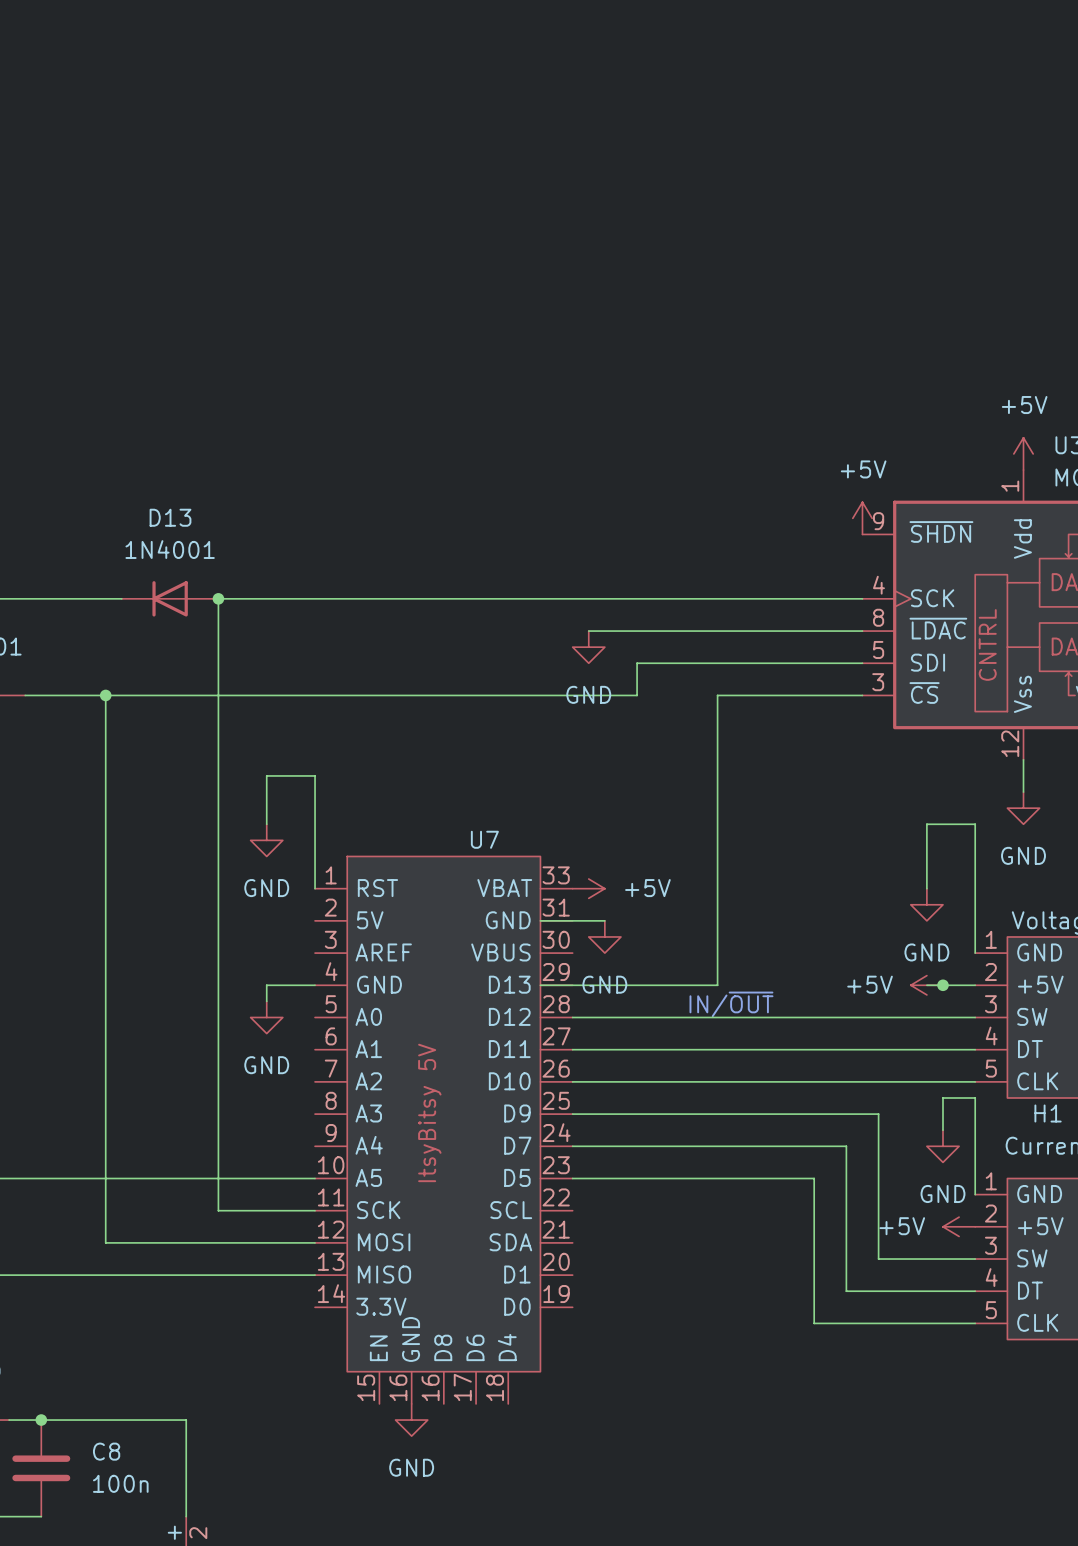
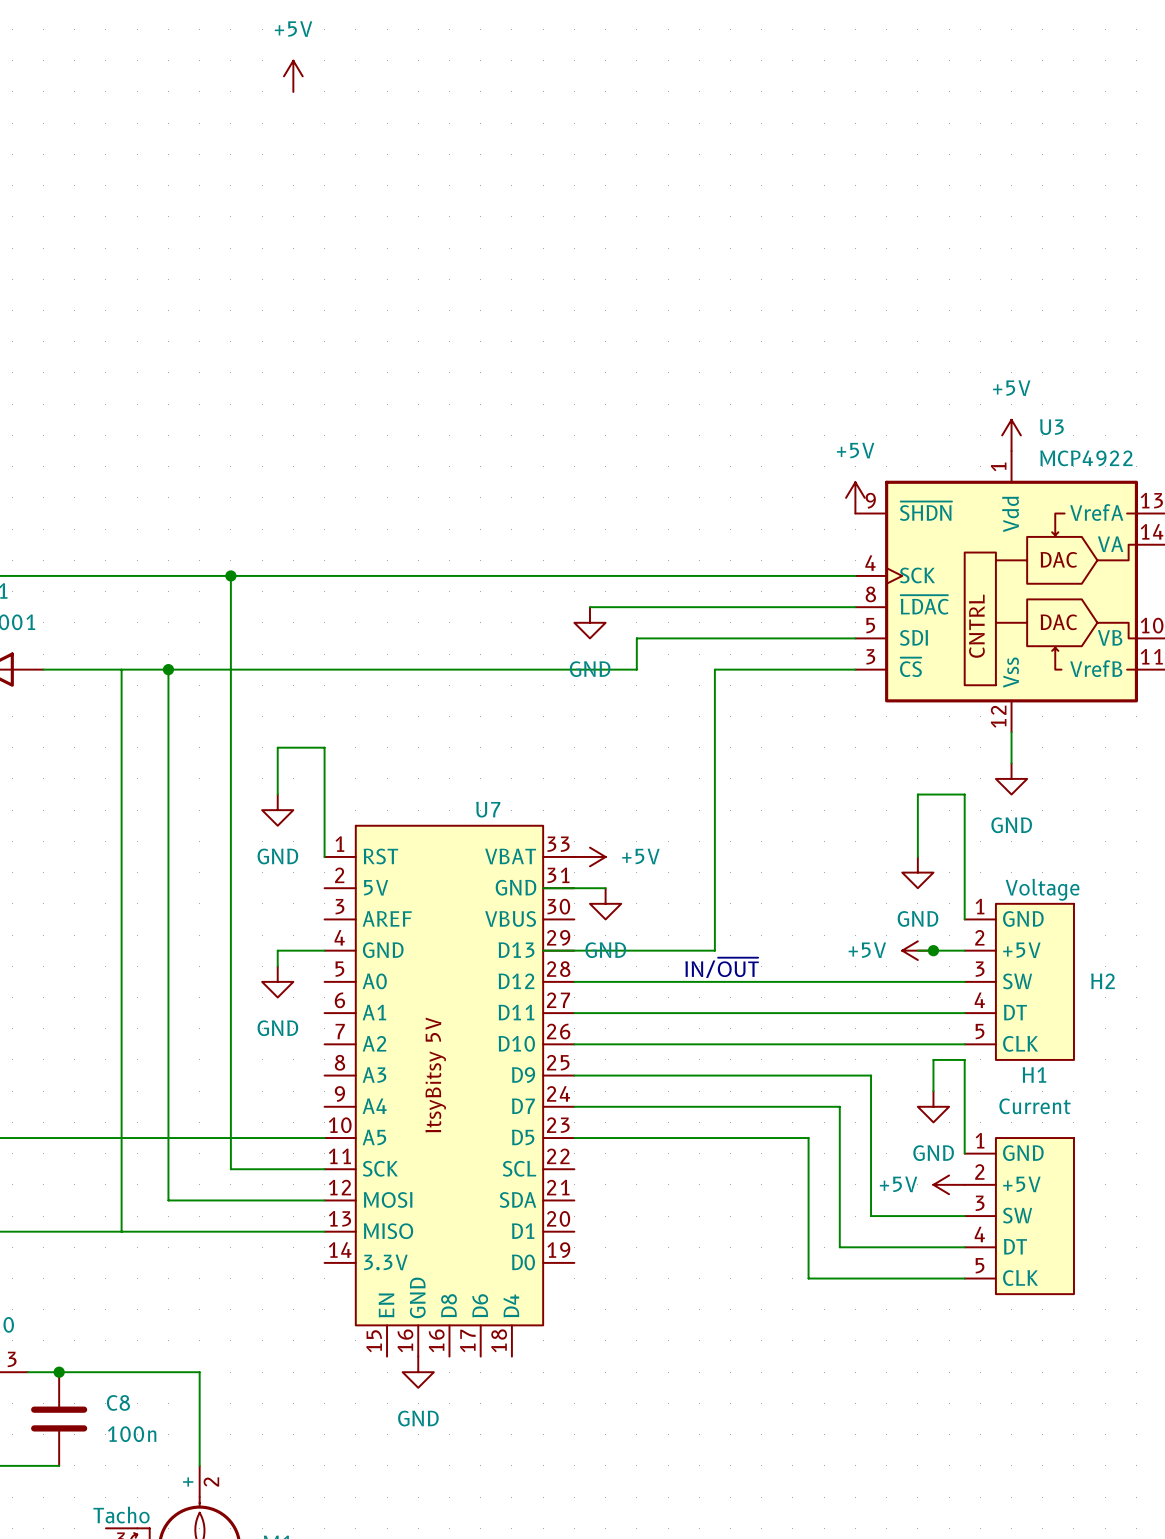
power symbol: none -> +5V (293, 76)
D13: 1N4001 (170, 598) -> none
junction position: (105, 695) -> (168, 669)
wire: none -> (168, 669) (168, 1200)
wire: (105, 1242) (154, 1242) -> (121, 1200) (121, 1231)

